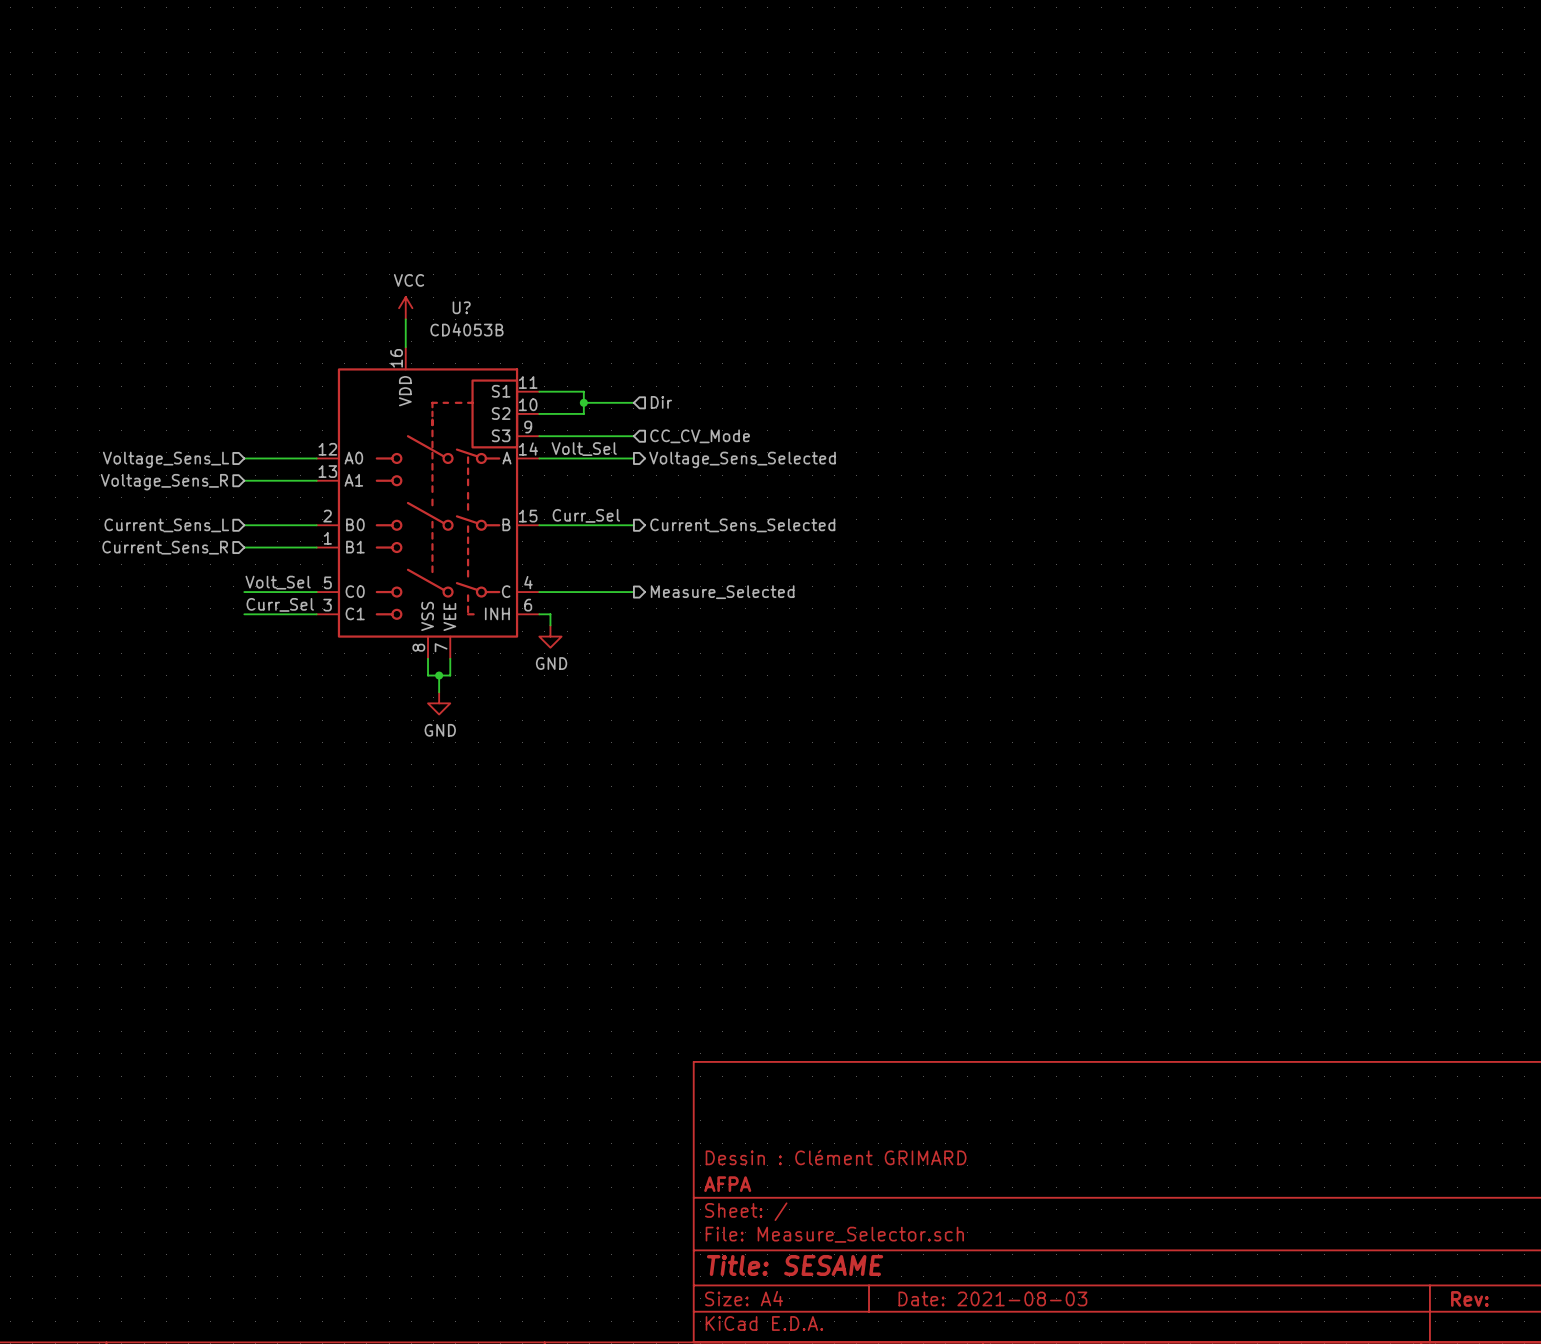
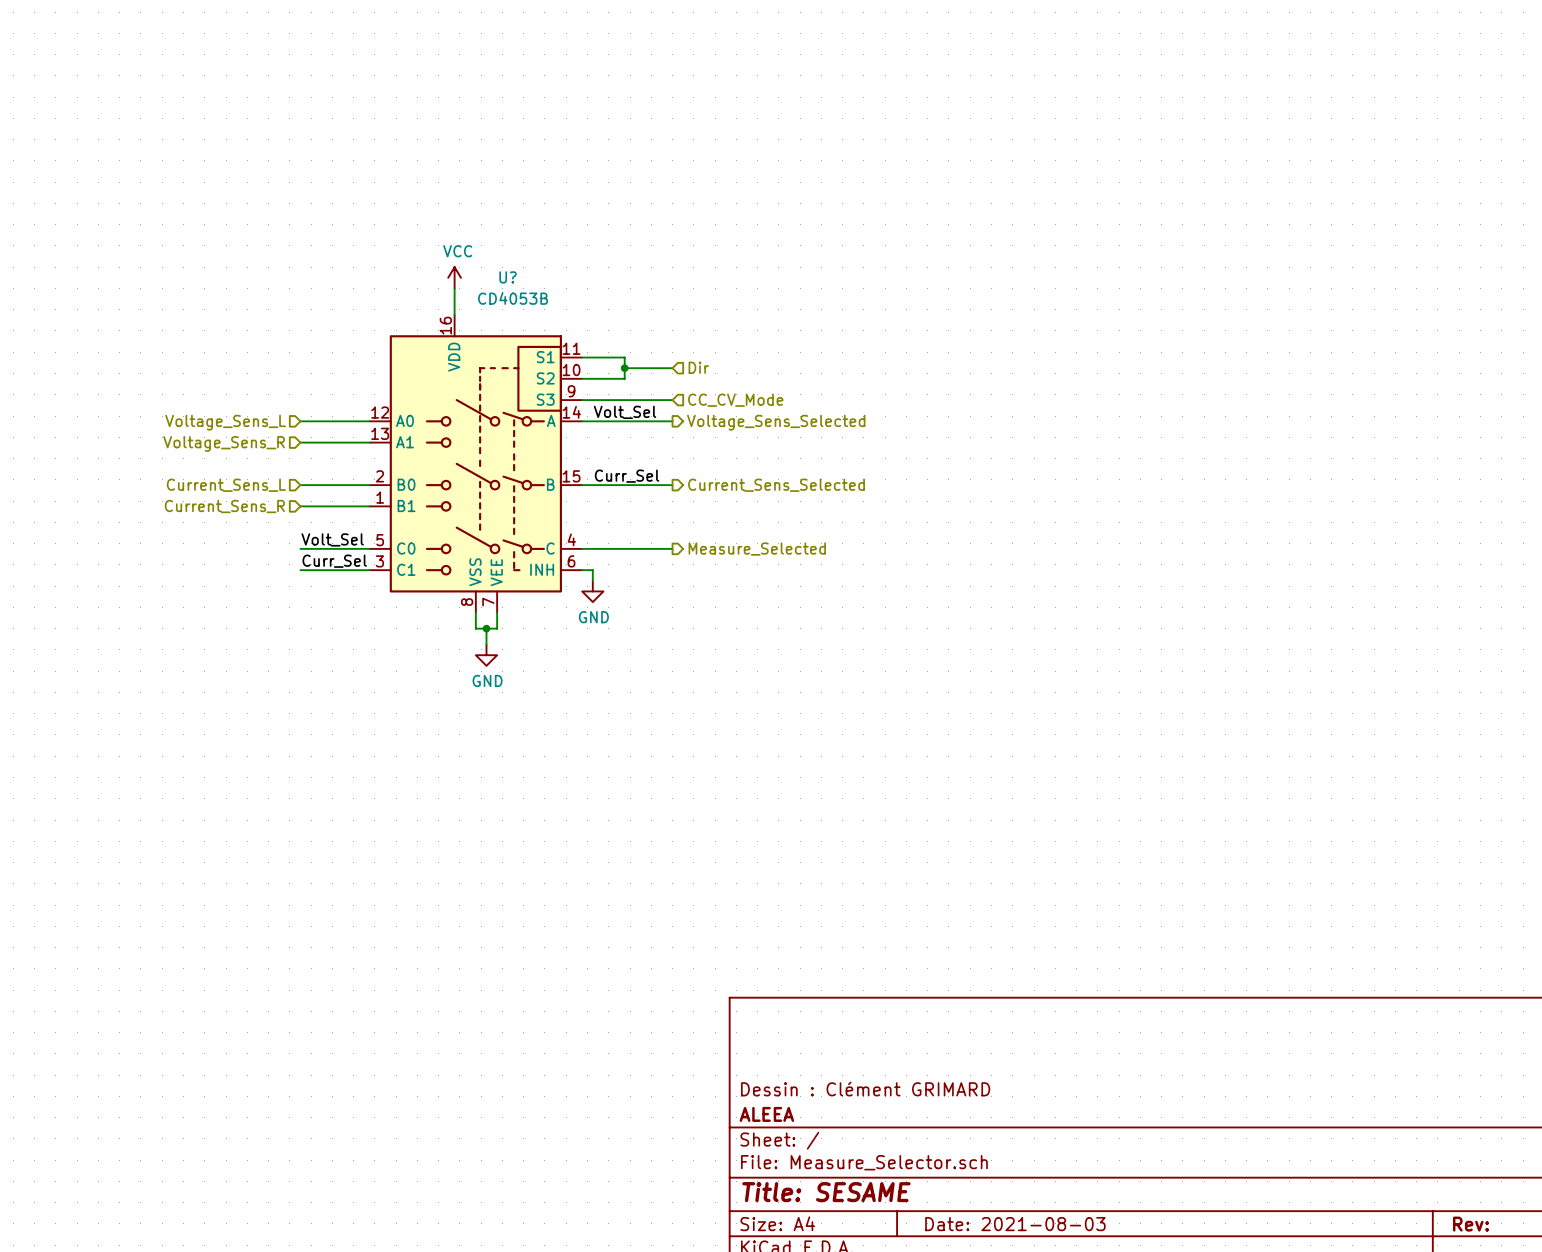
title block: AFPA (727, 1184) -> ALEEA (766, 1114)

